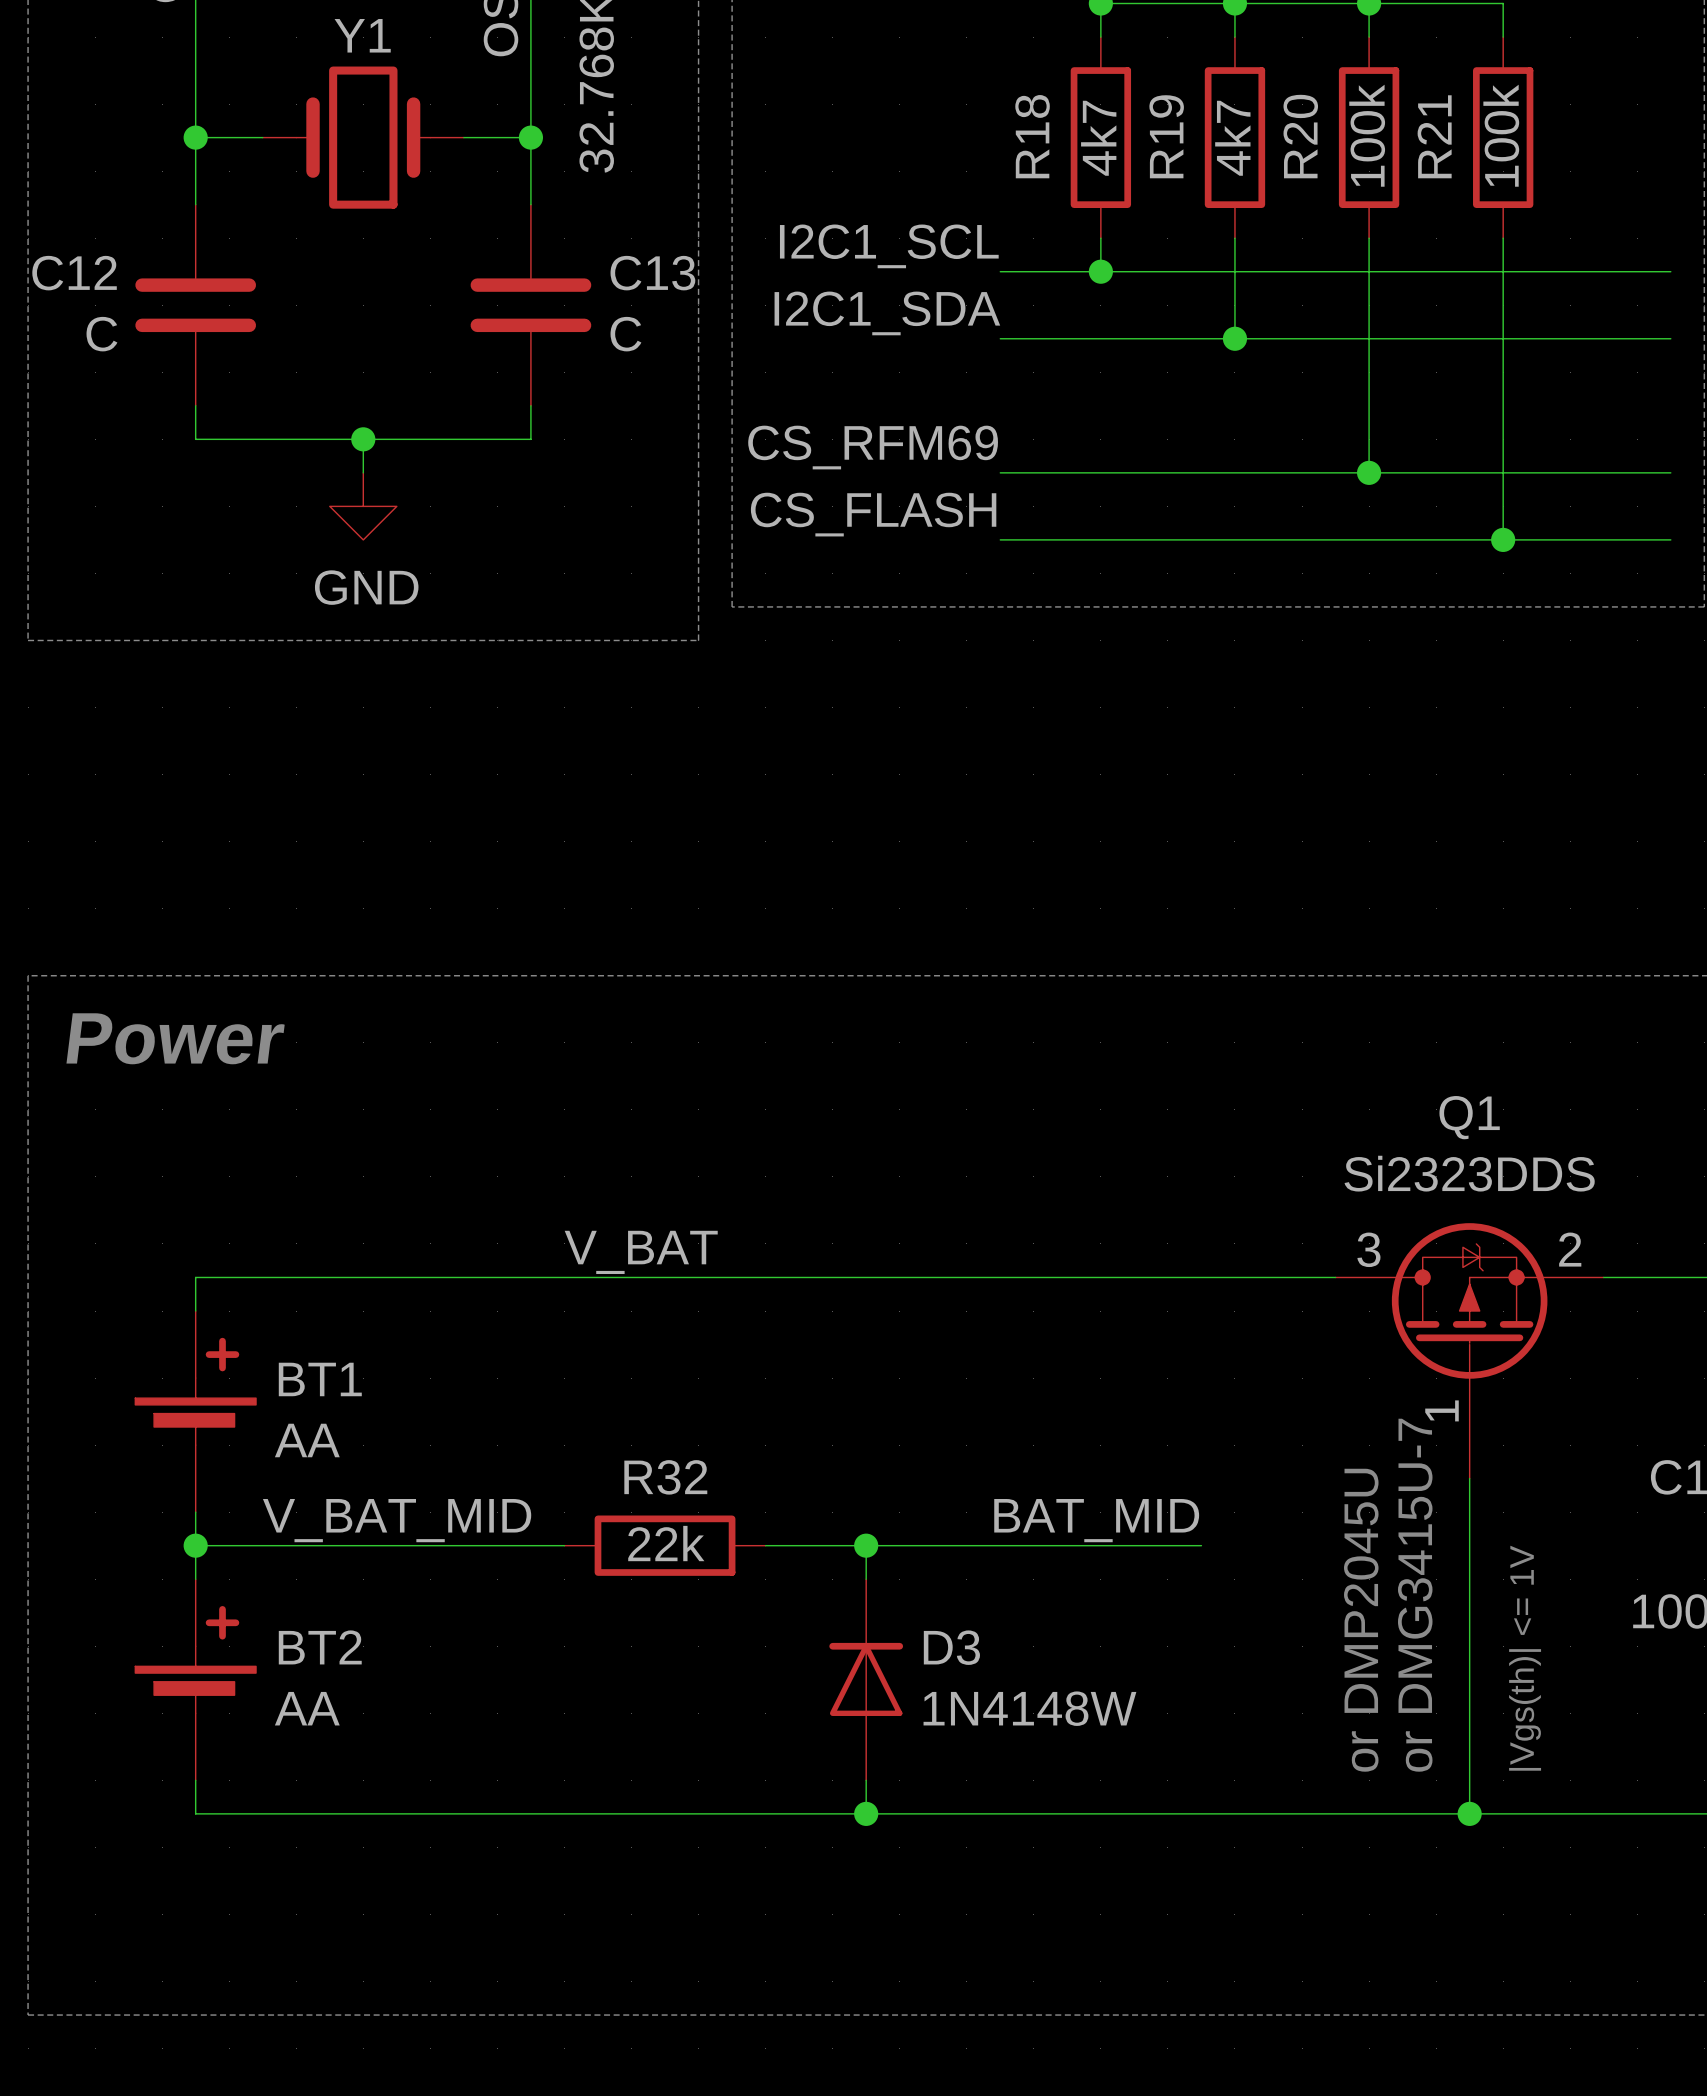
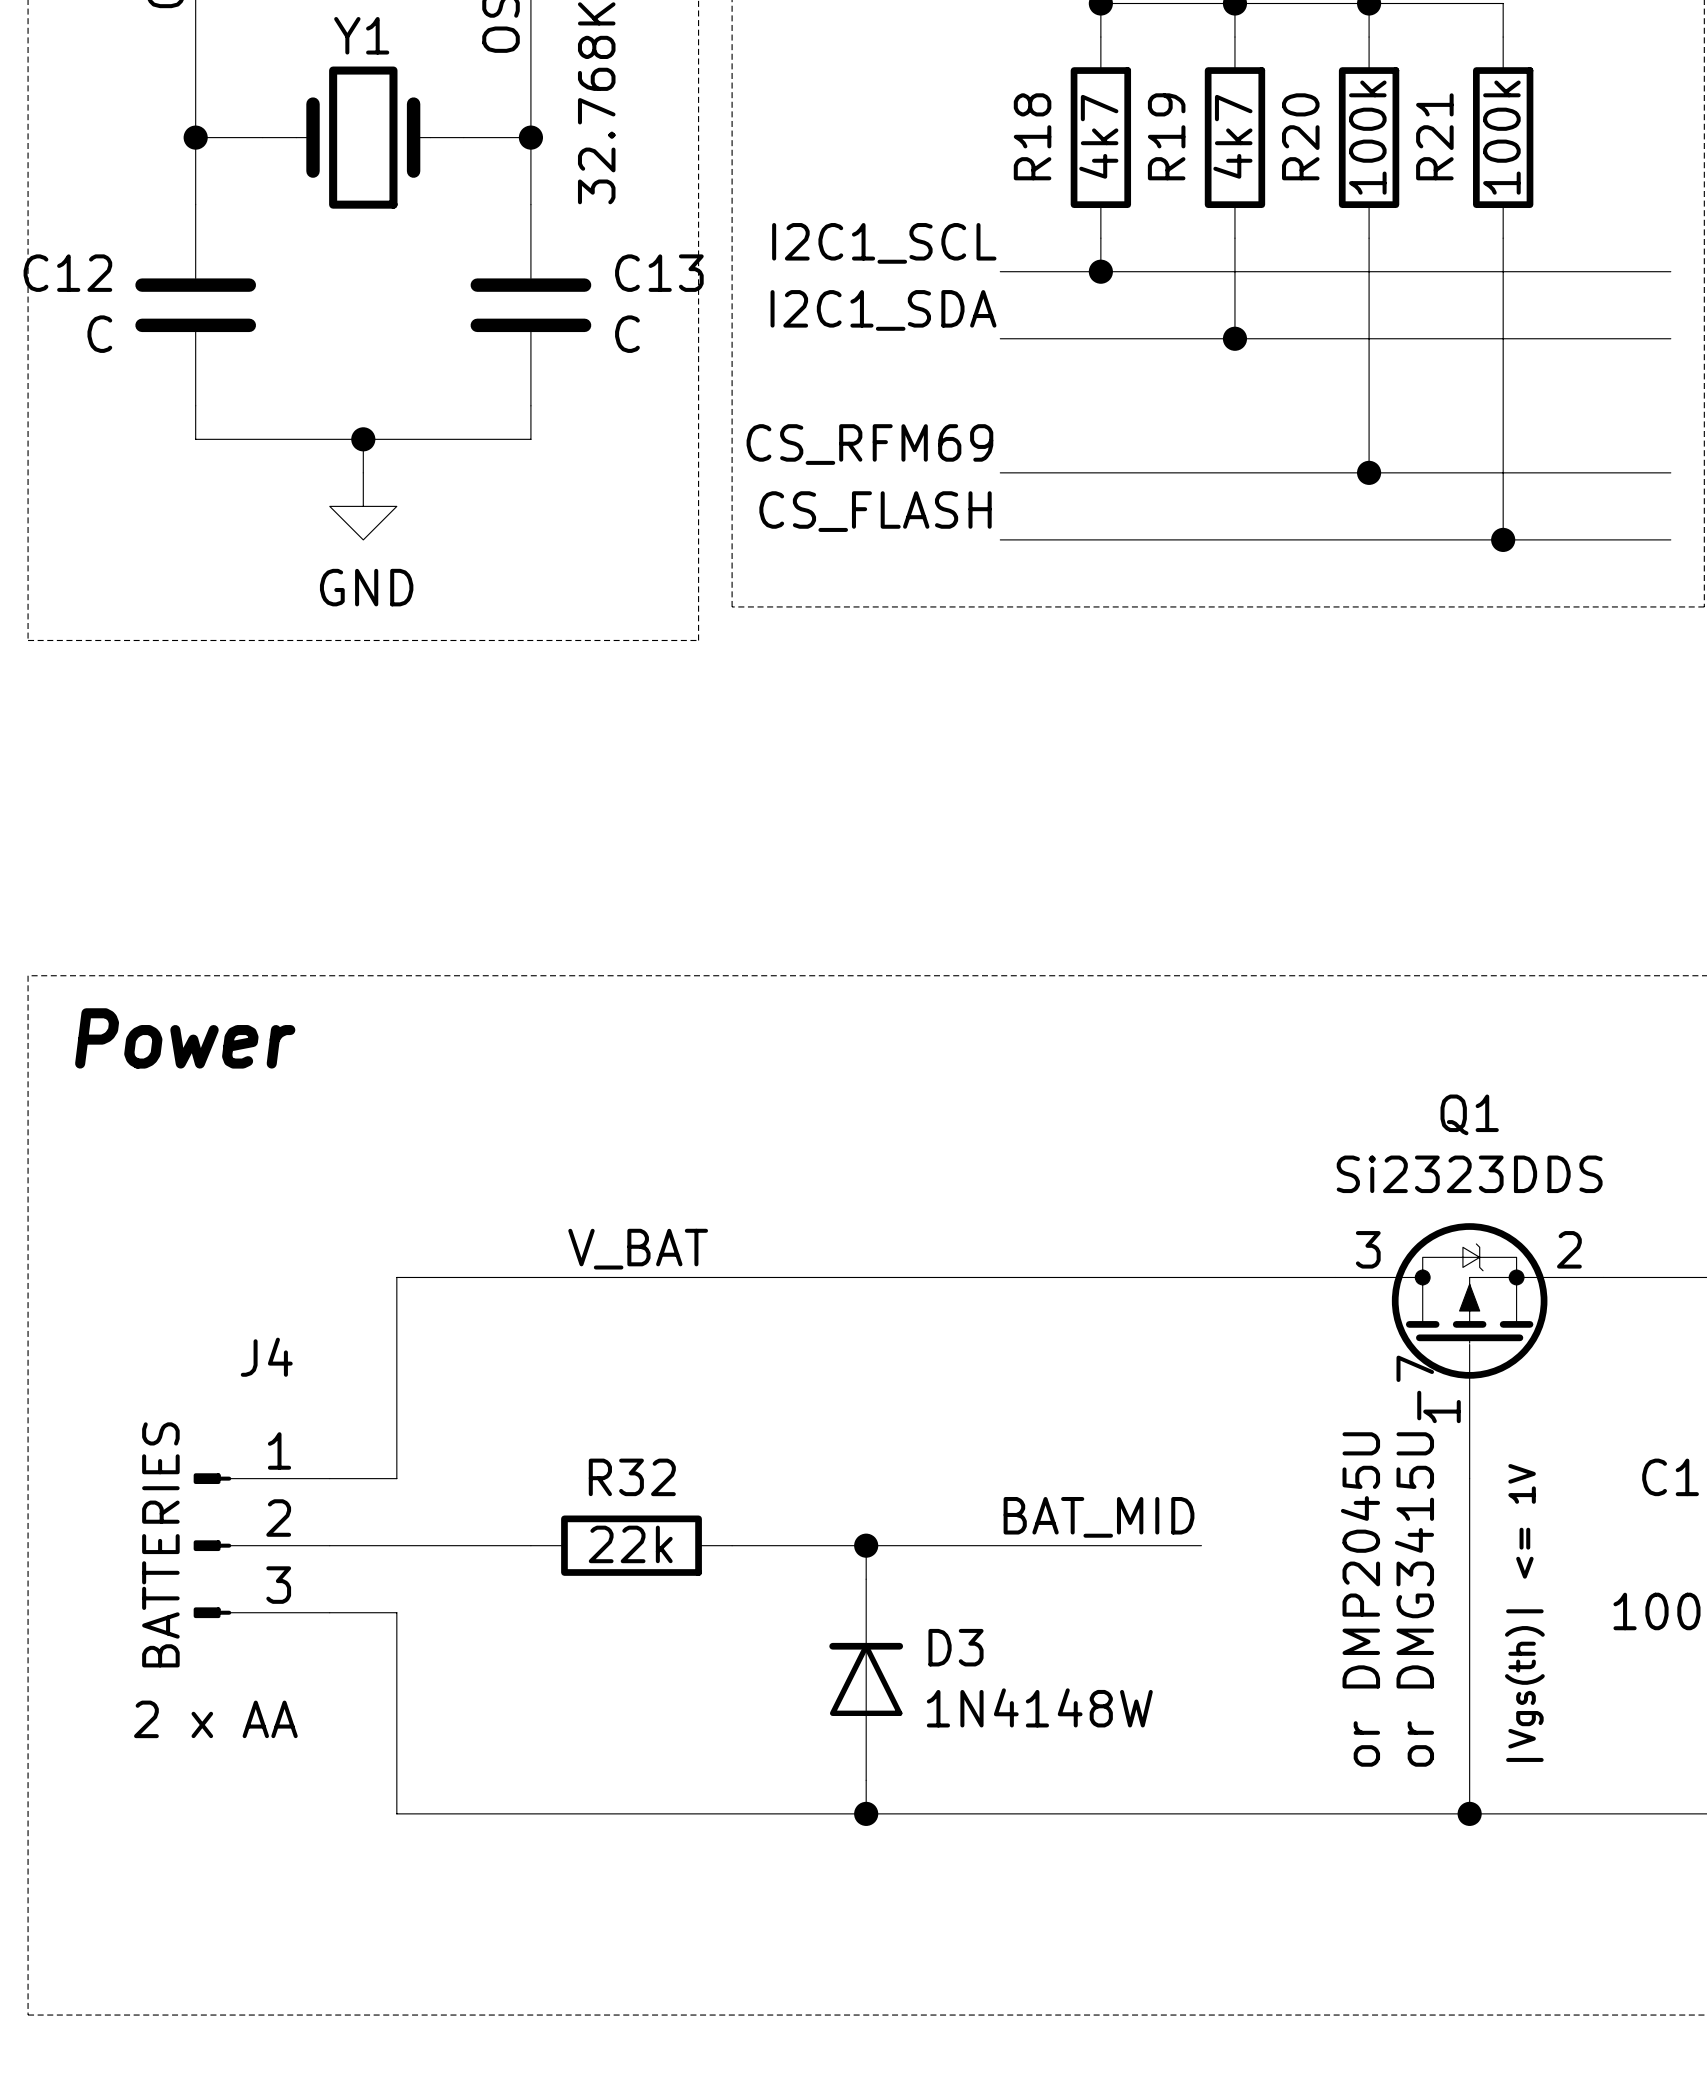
wire: (396, 1277) (195, 1277) (195, 1311) -> (396, 1277) (396, 1478) (329, 1478)
BT1: AA (195, 1411) -> none
wire: (195, 1512) (195, 1579) -> none
label: V_BAT_MID (397, 1520) -> none
junction: (195, 1545) -> none
J4: none -> BATTERIES (261, 1545)
R32 position: (665, 1545) -> (631, 1545)
BT2: AA (195, 1679) -> none
text: none -> 2 x AA (215, 1719)
wire: (195, 1780) (195, 1813) (396, 1813) -> (329, 1612) (396, 1612) (396, 1813)

